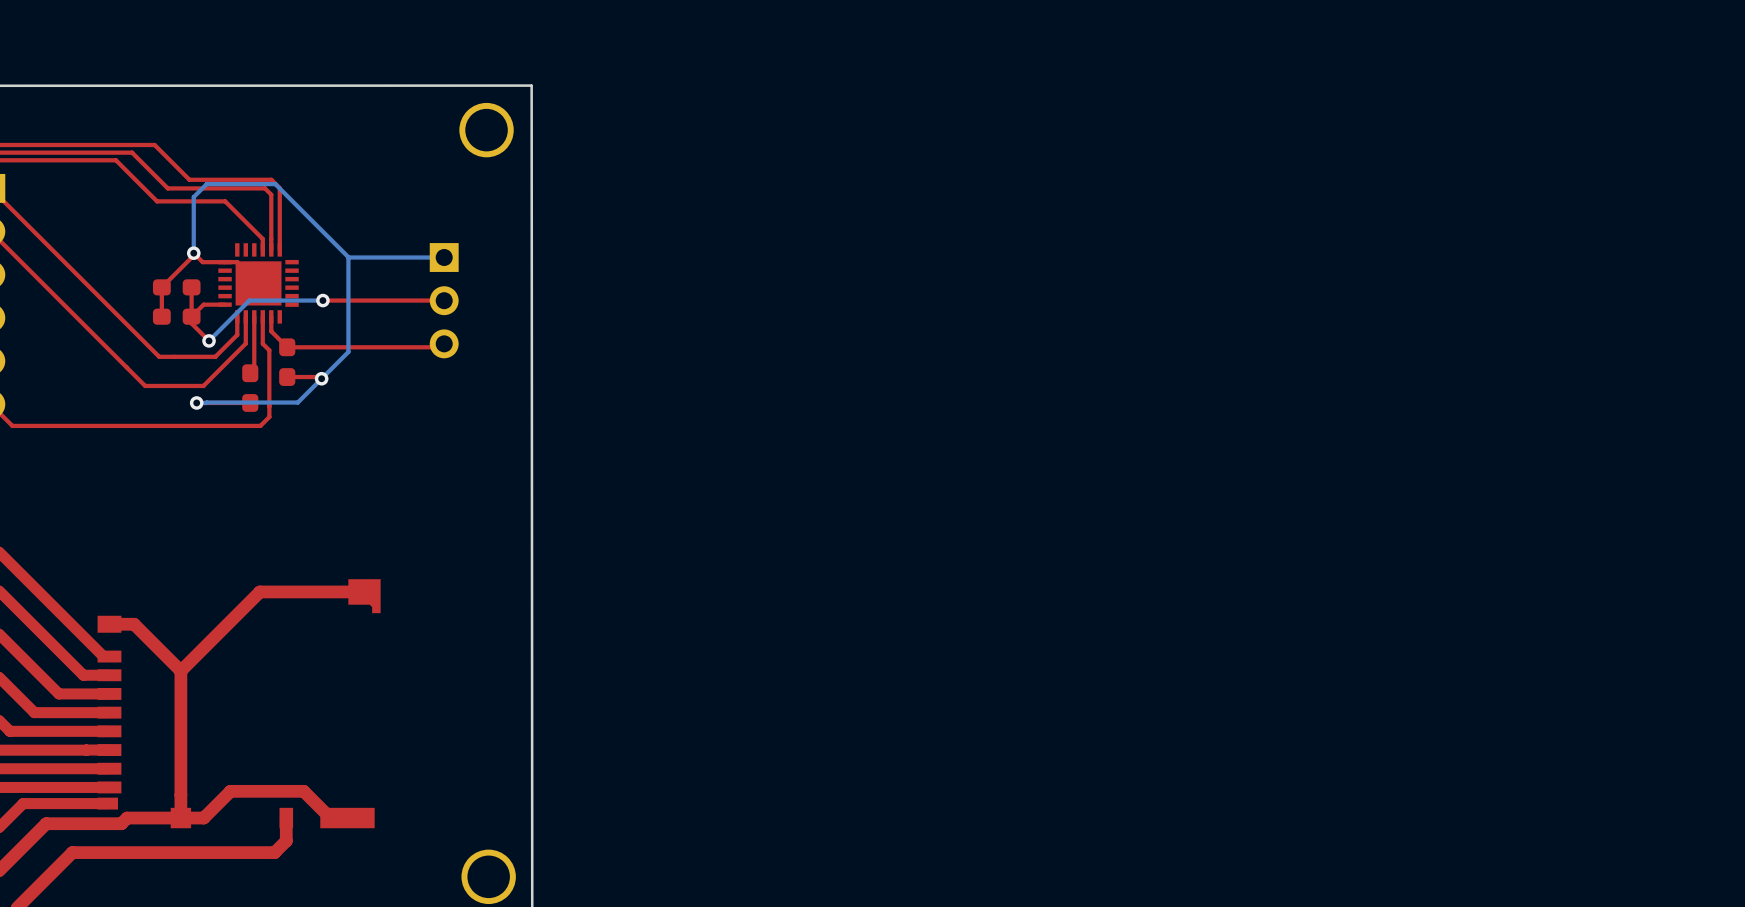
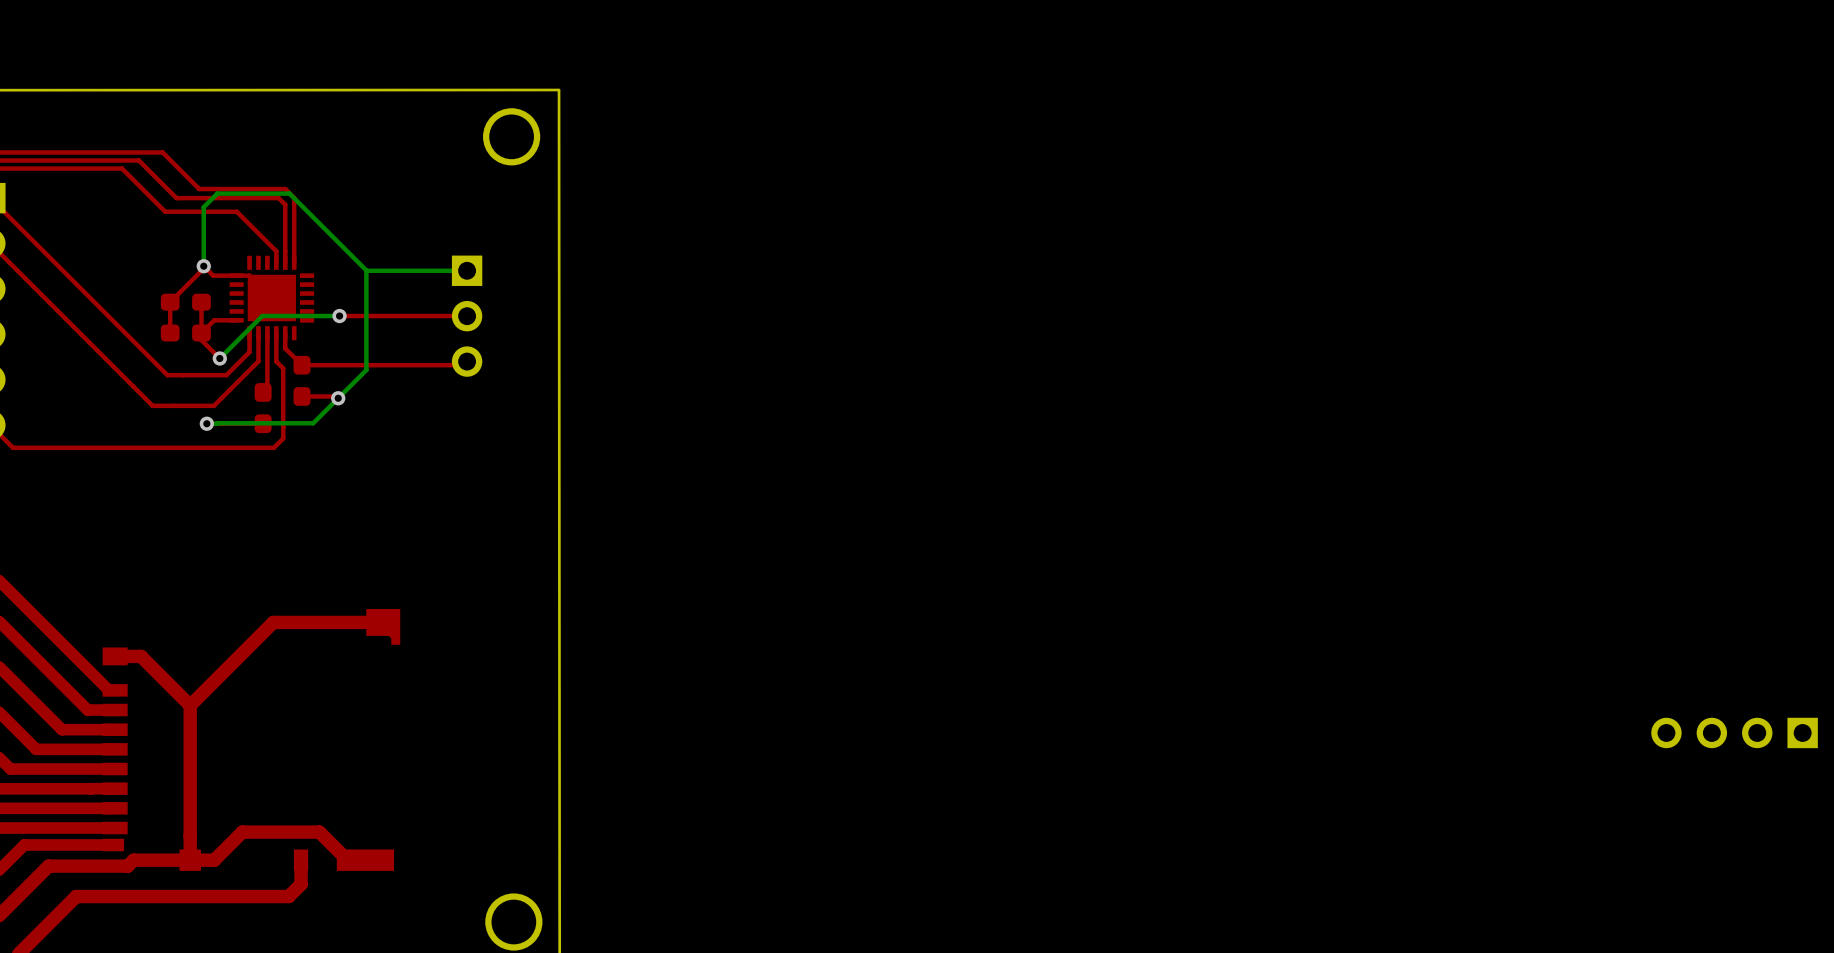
part: none -> (1734, 732)

